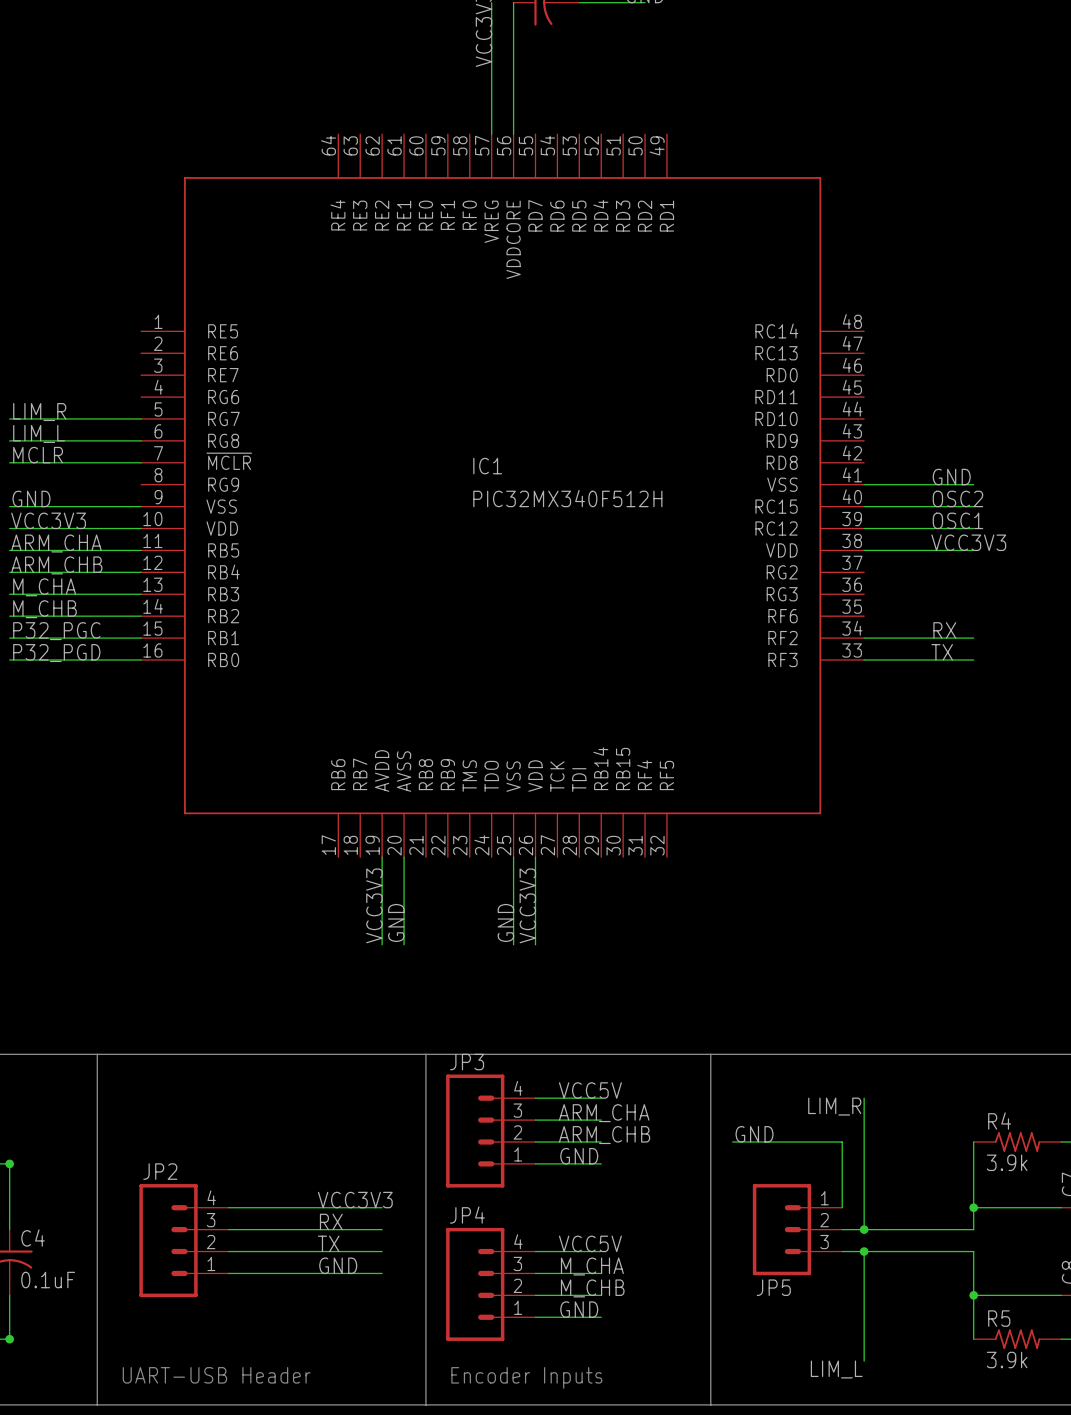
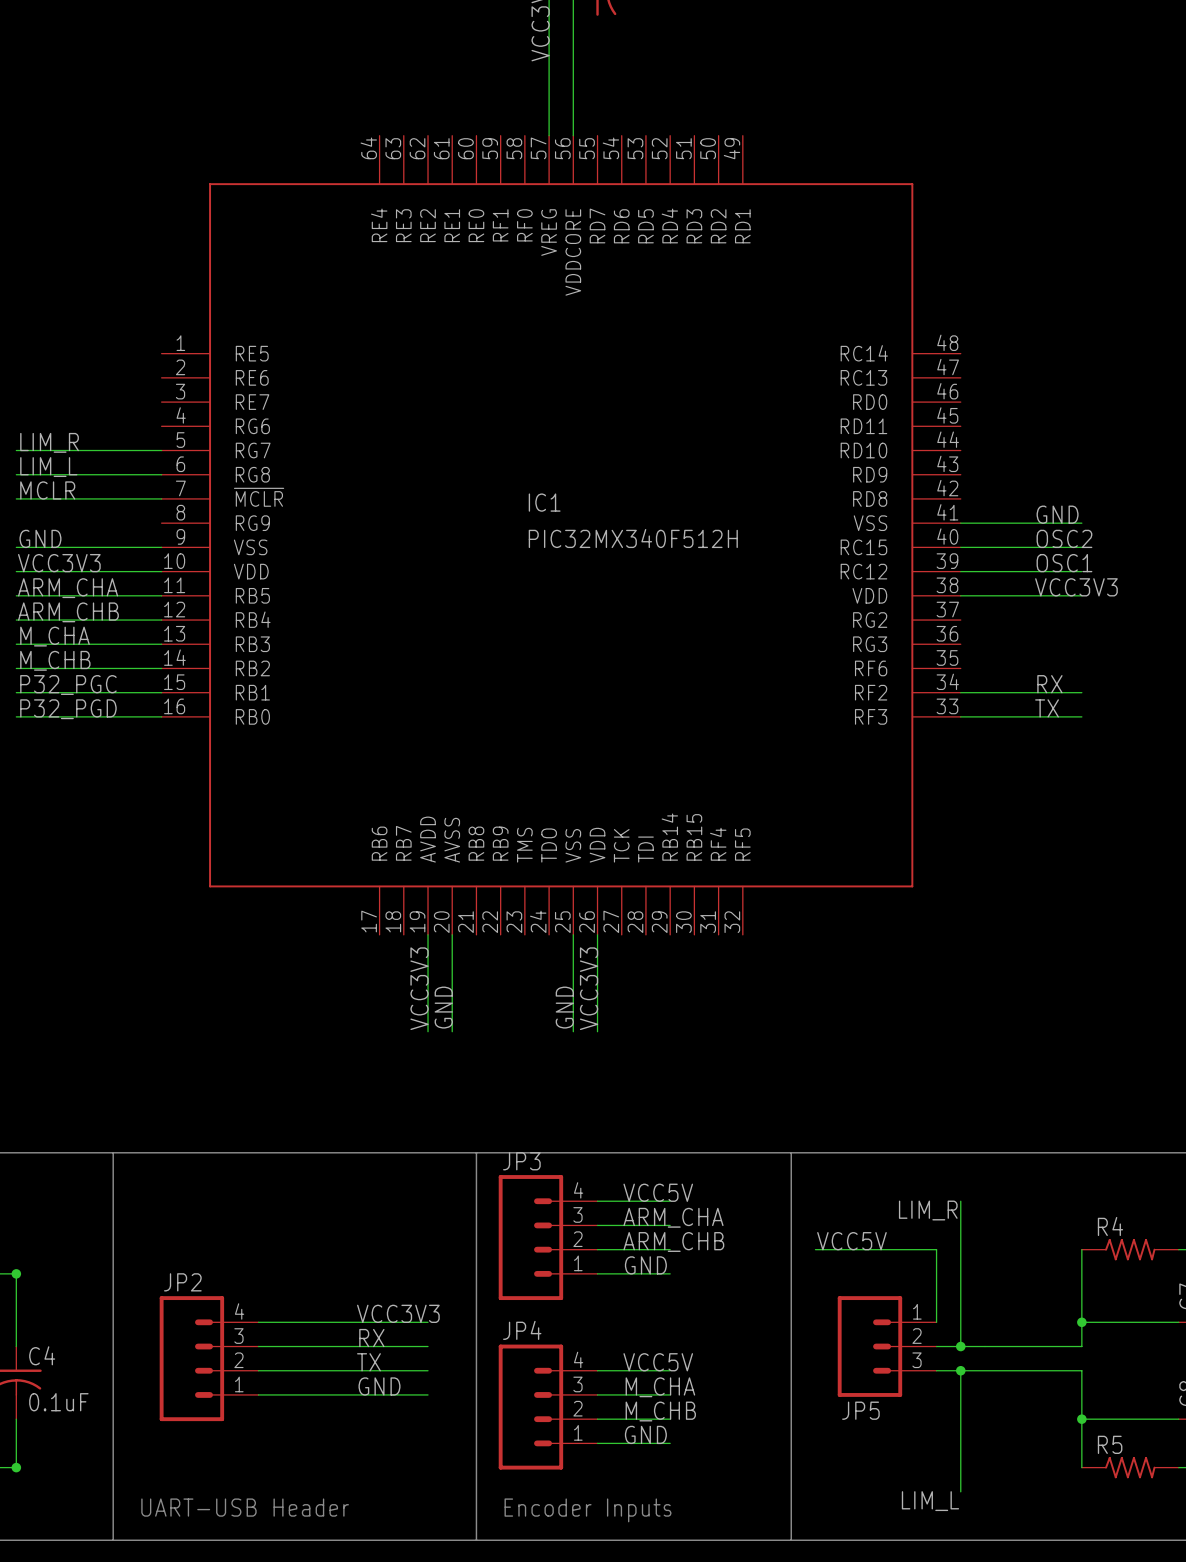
label: GND (754, 1134) -> VCC5V (851, 1241)
R4 value: 3.9k (1007, 1162) -> none
R5 value: 3.9k (1007, 1359) -> none

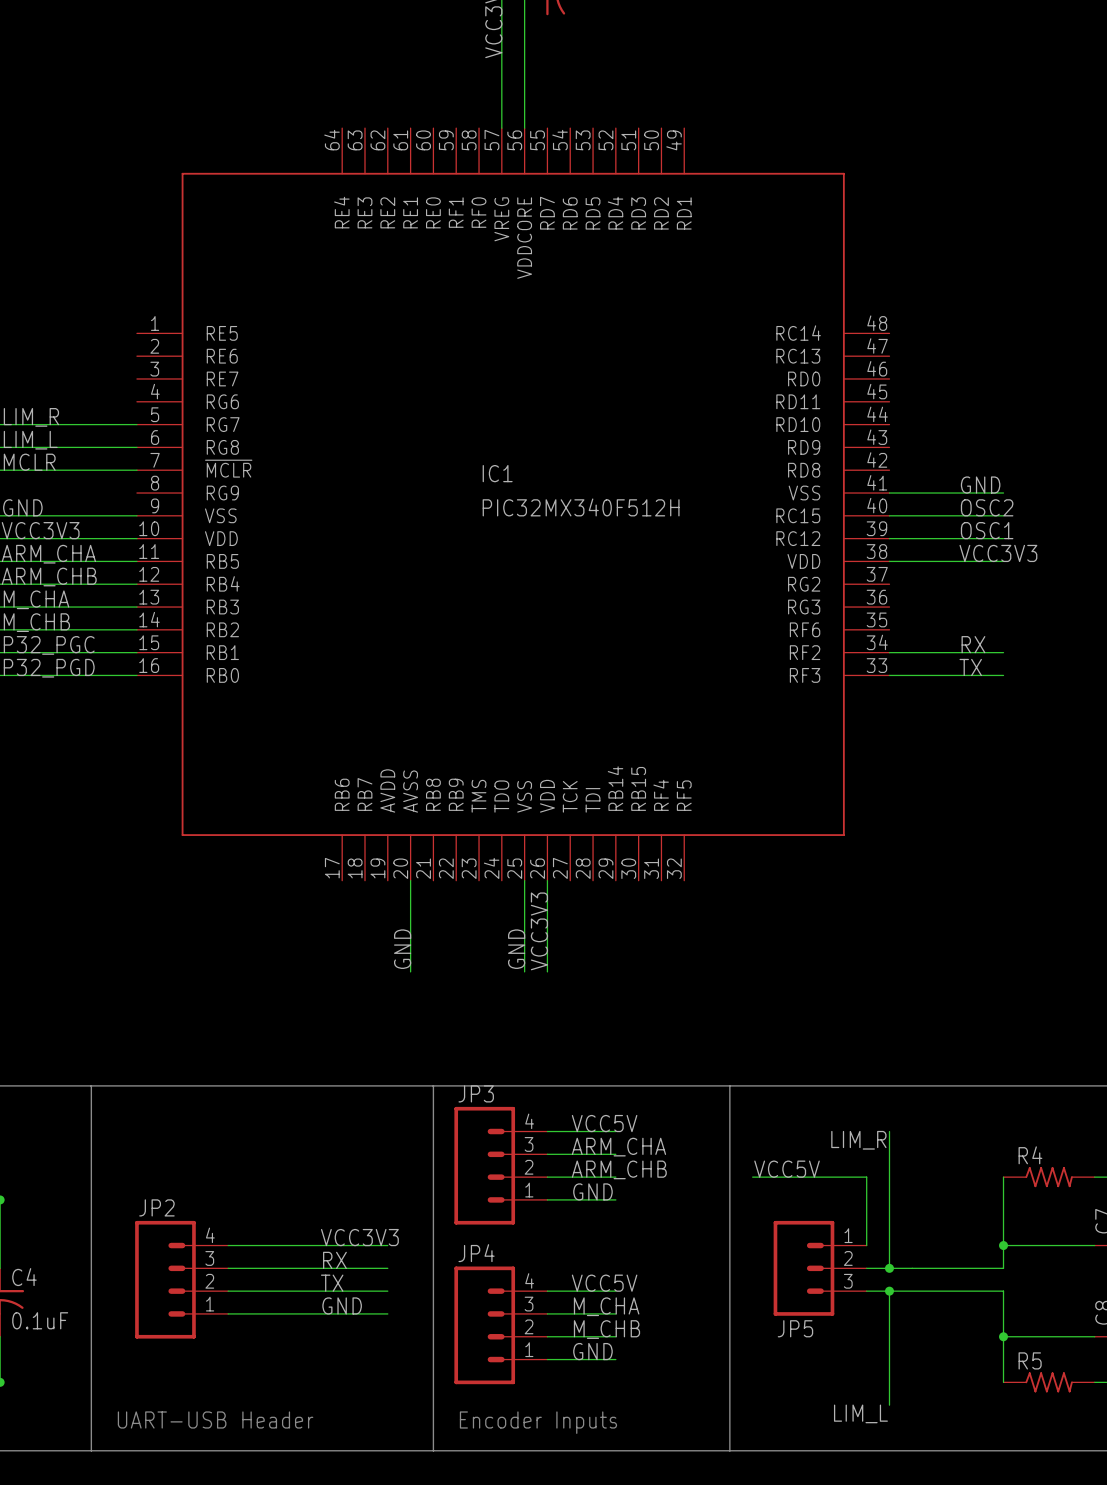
wire: (428, 934) (428, 1031) -> none
label: VCC3V3 (419, 988) -> none

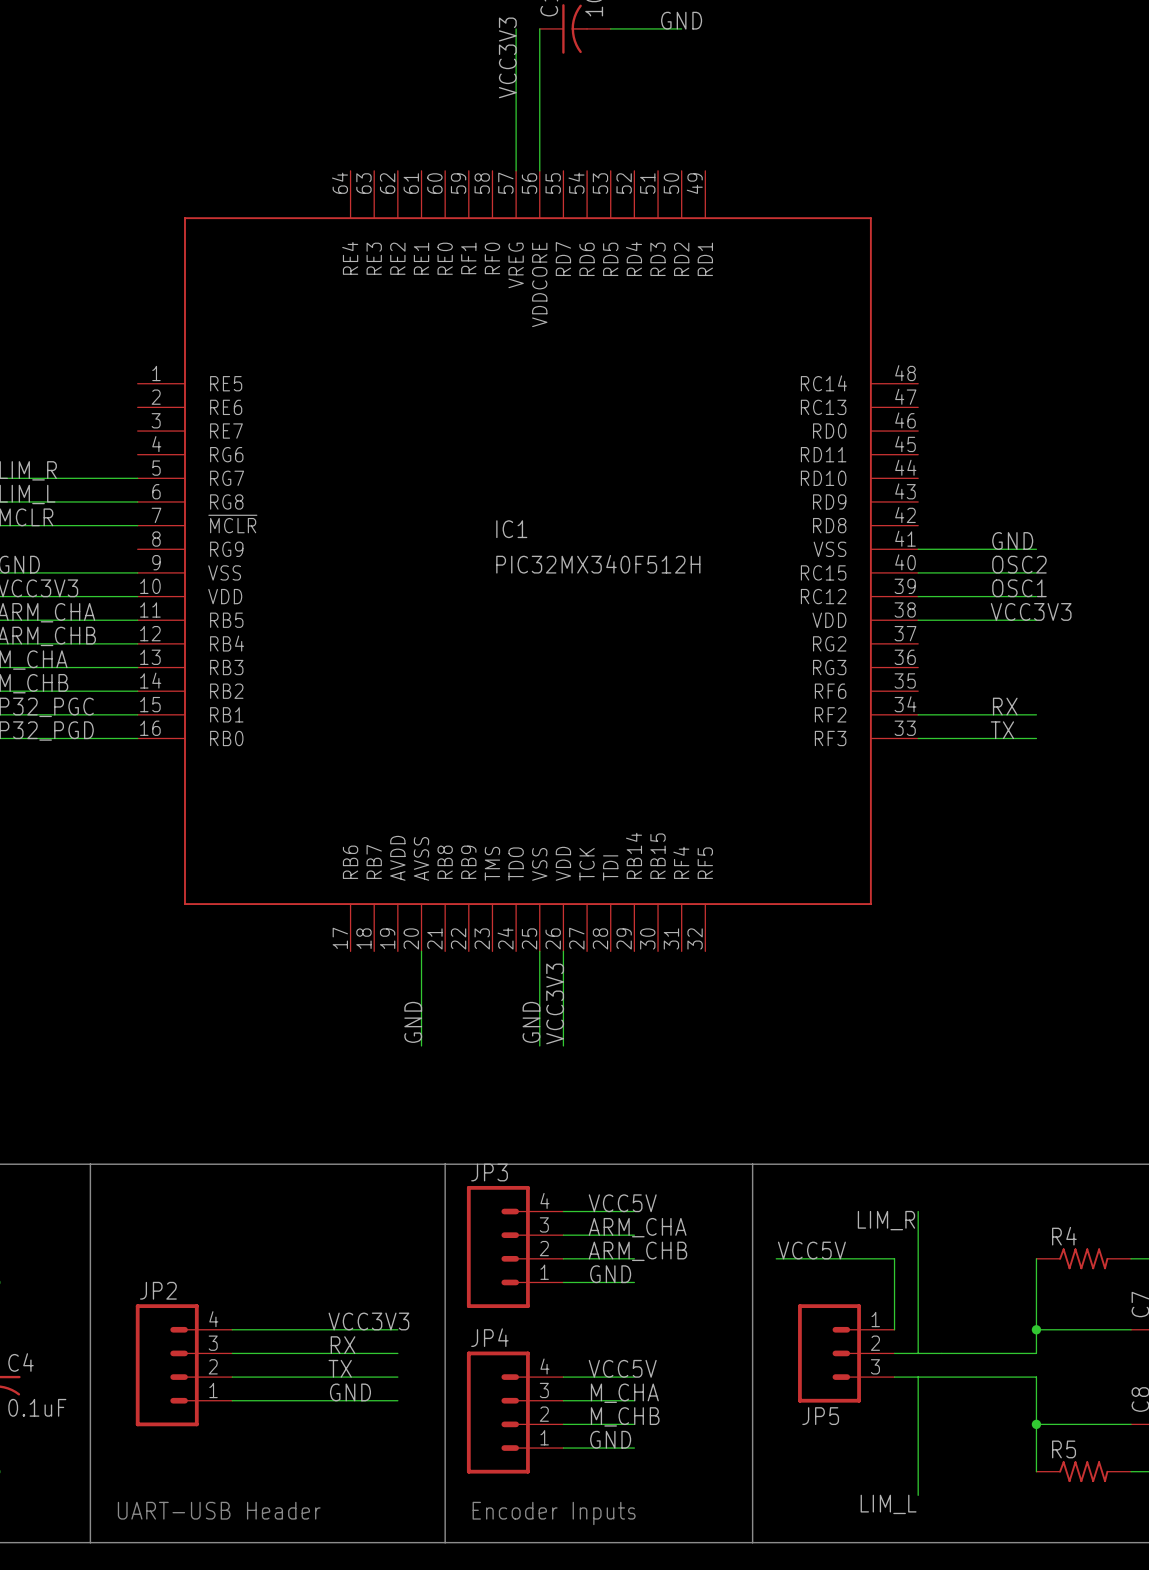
junction: (889, 1268) -> none
junction: (889, 1291) -> none

